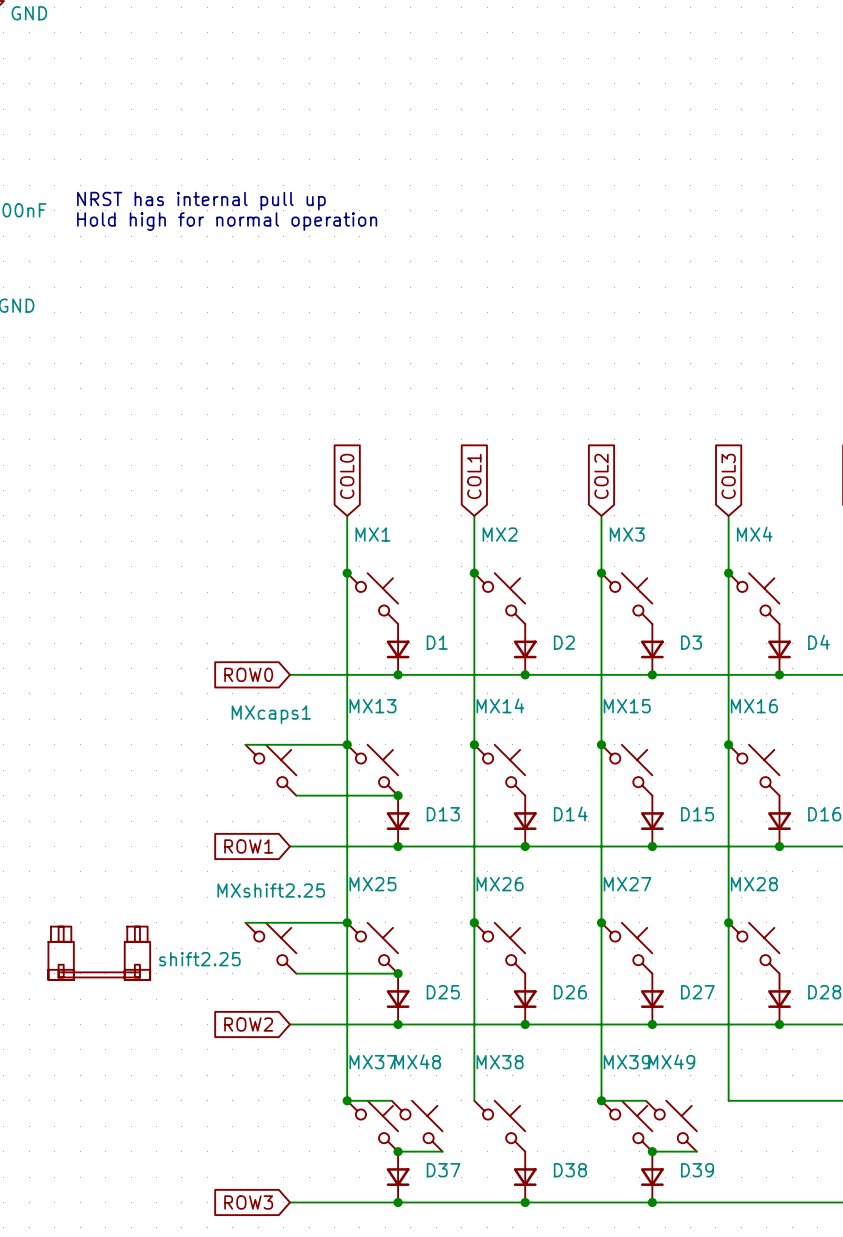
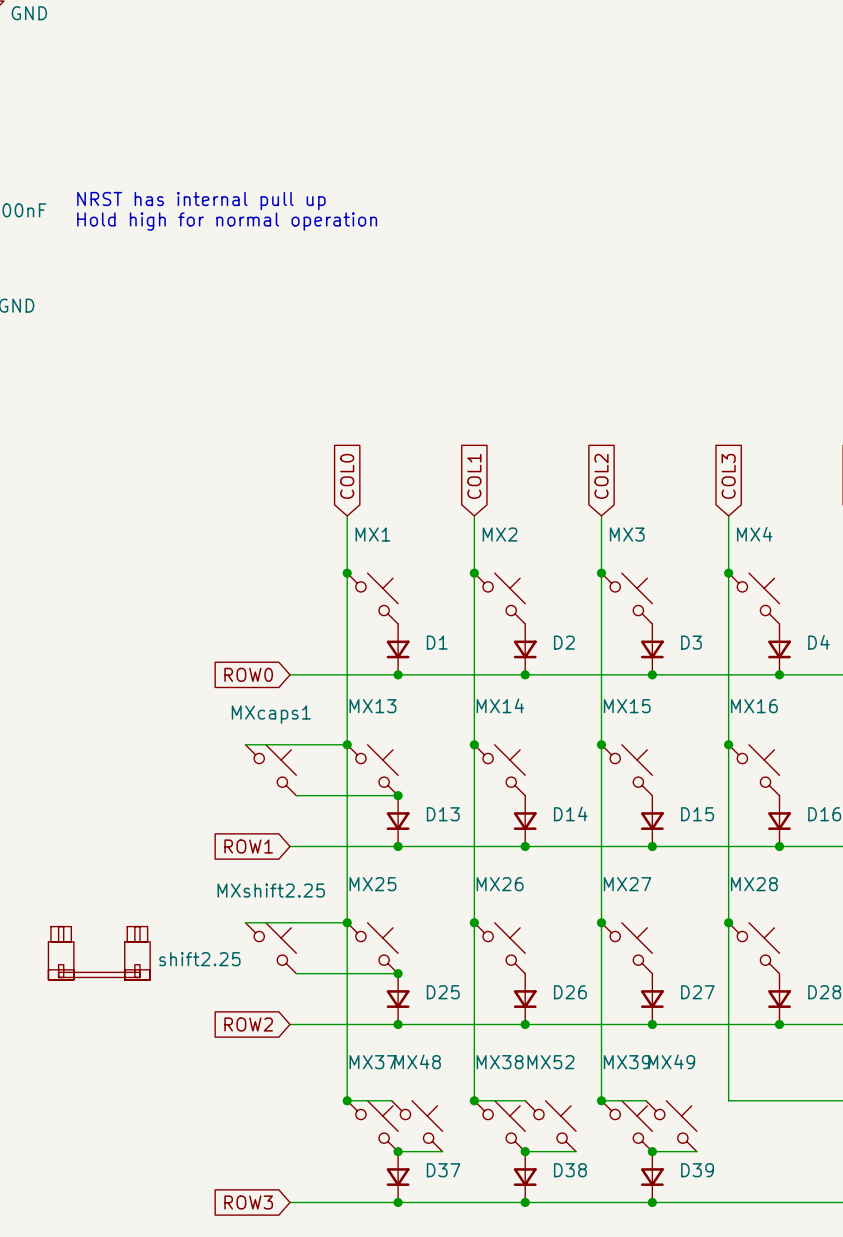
wire: none -> (474, 1100) (525, 1100)
junction: none -> (474, 1100)
MX52: none -> (550, 1126)
wire: none -> (525, 1151) (576, 1151)
junction: none -> (525, 1151)

